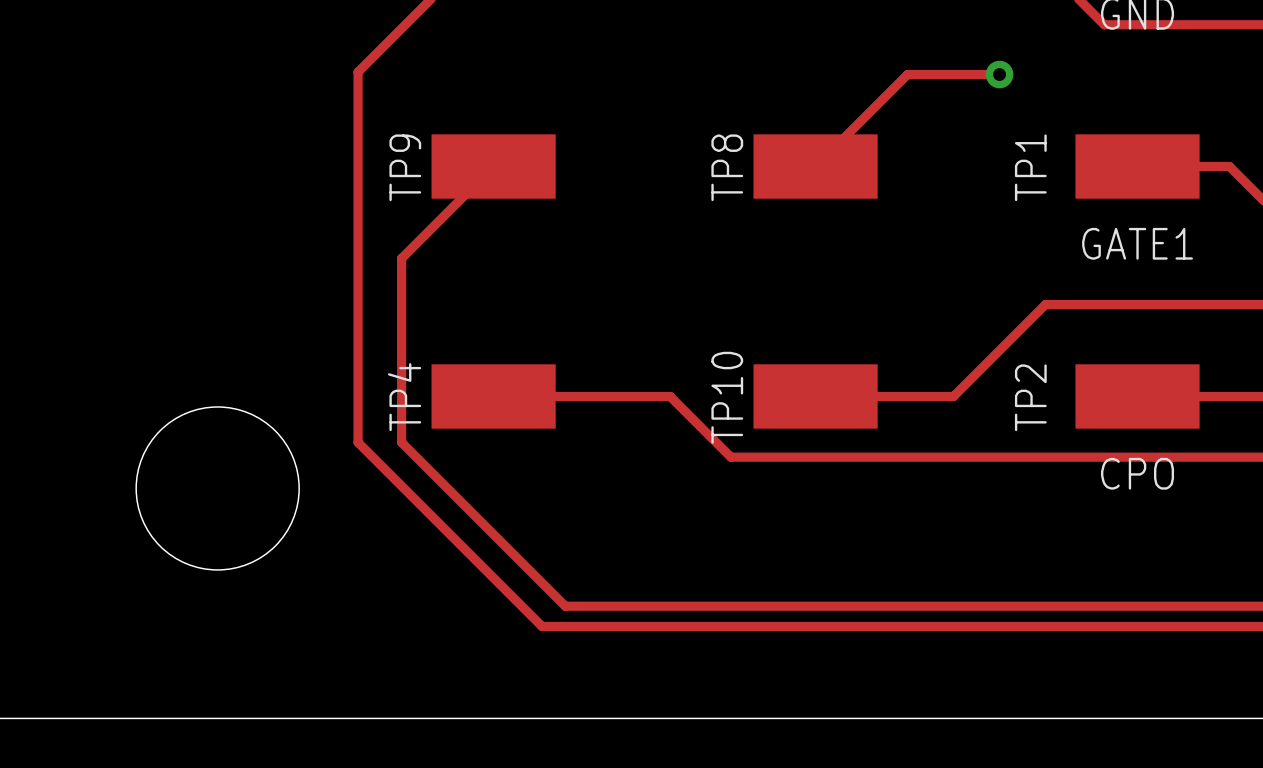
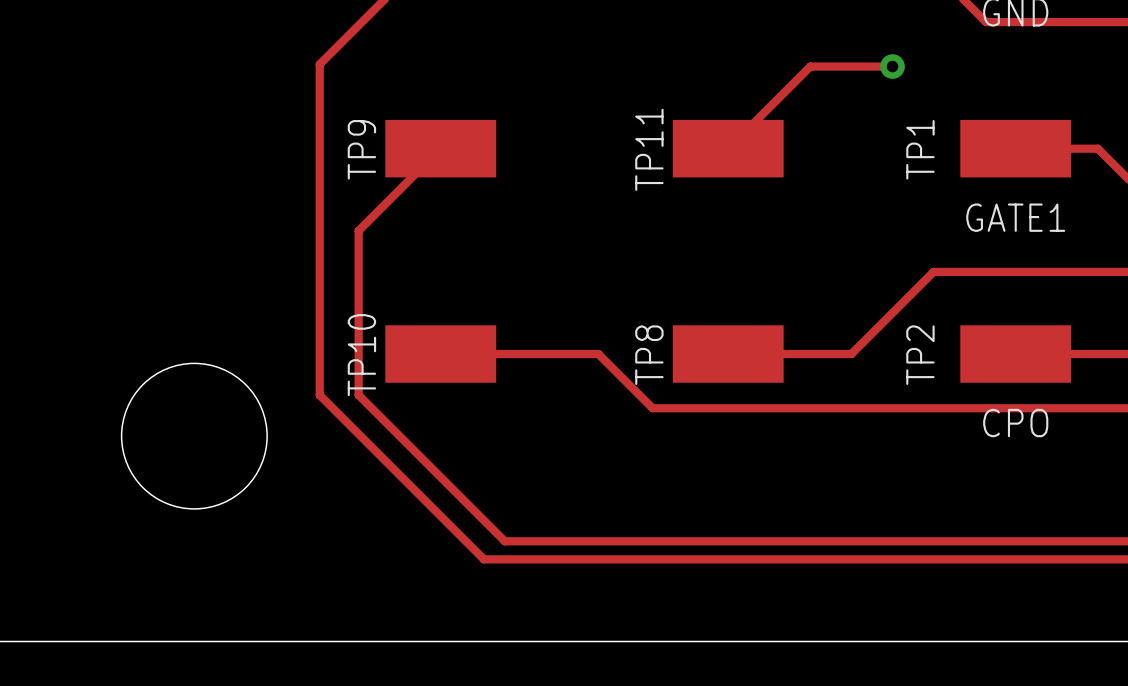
TP8 name: TP8 (727, 167) -> TP11 (649, 149)
TP4 name: TP4 (404, 397) -> TP10 (361, 355)
TP10 name: TP10 (727, 397) -> TP8 (649, 355)

